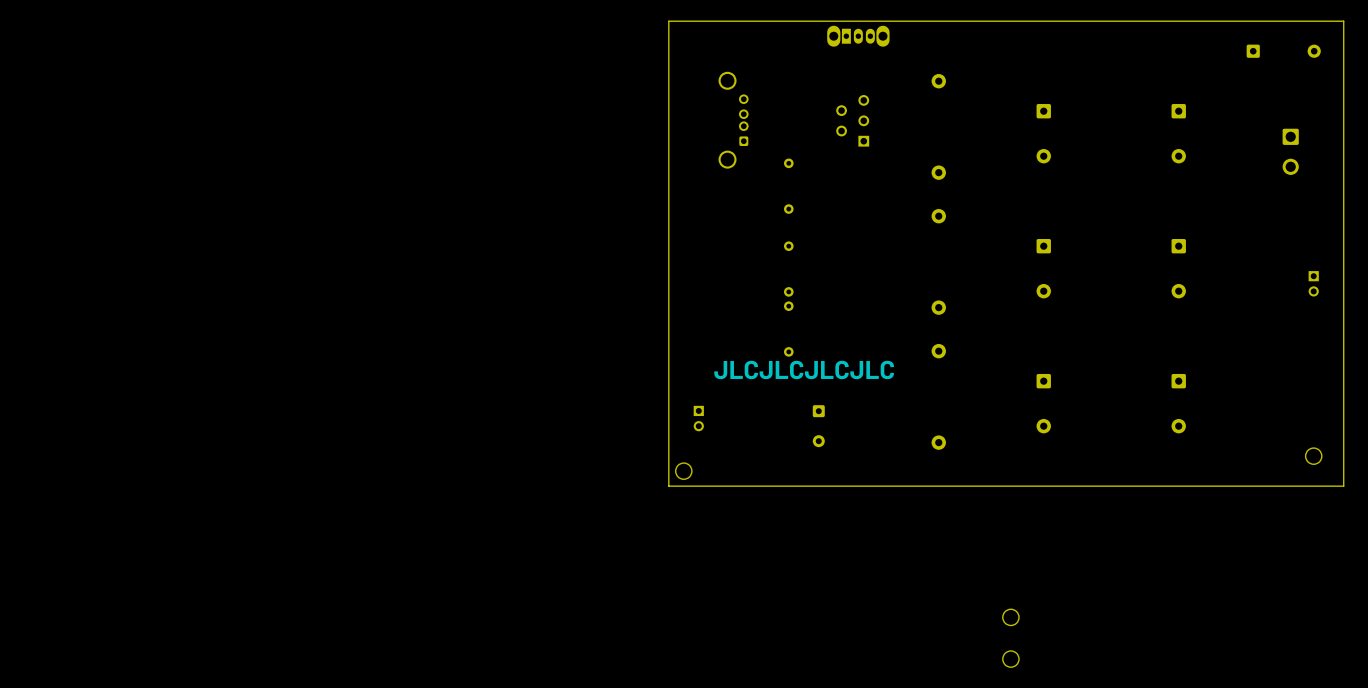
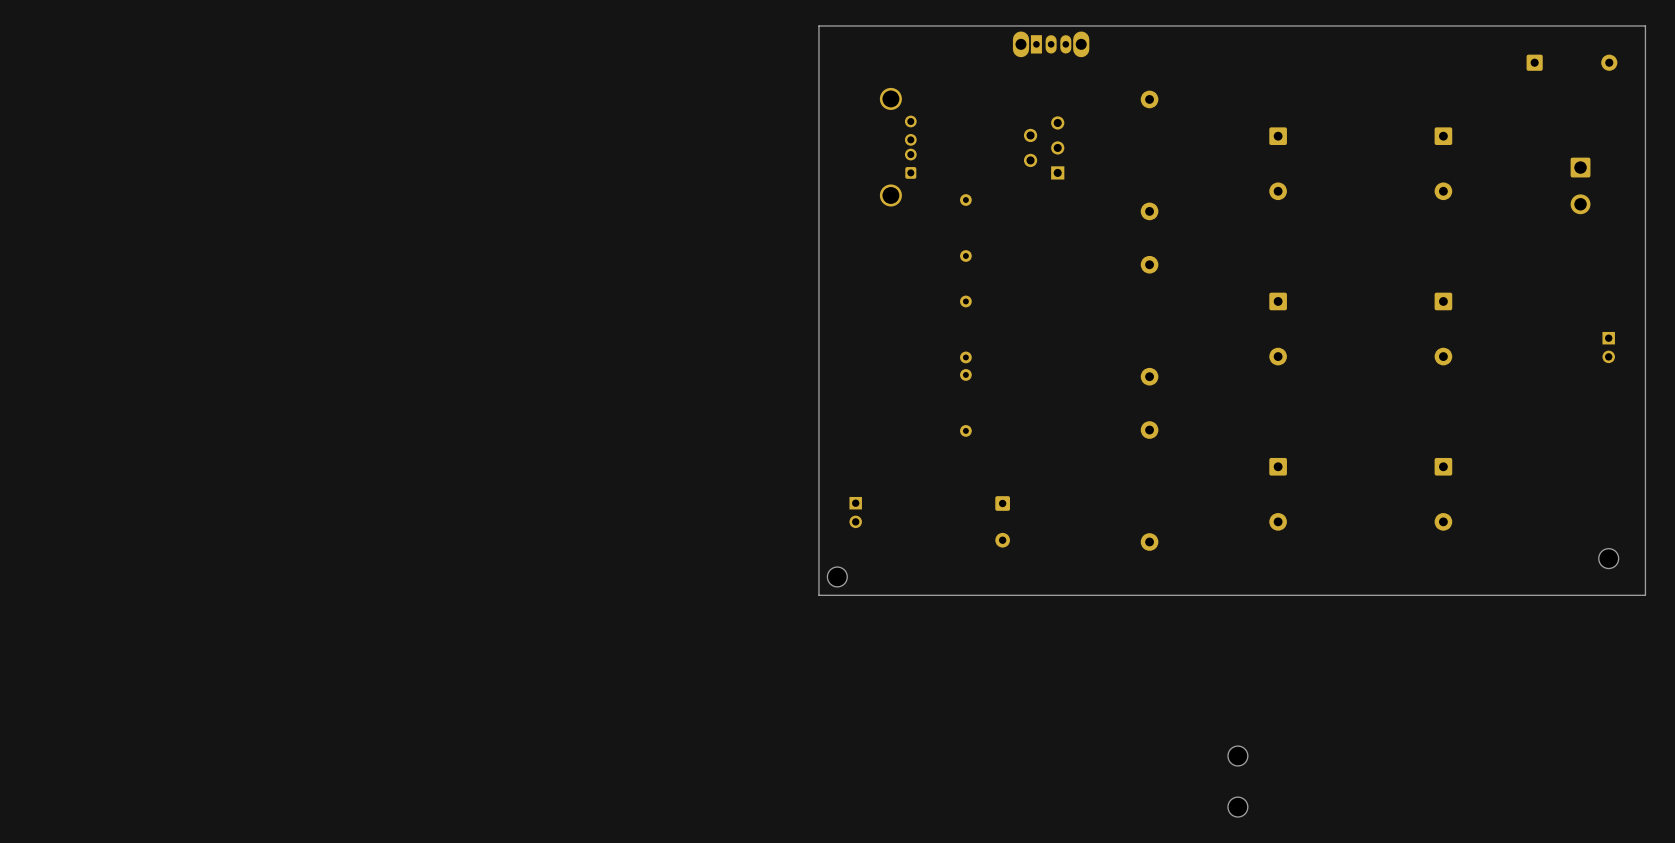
text: JLCJLCJLCJLC (804, 369) -> none

